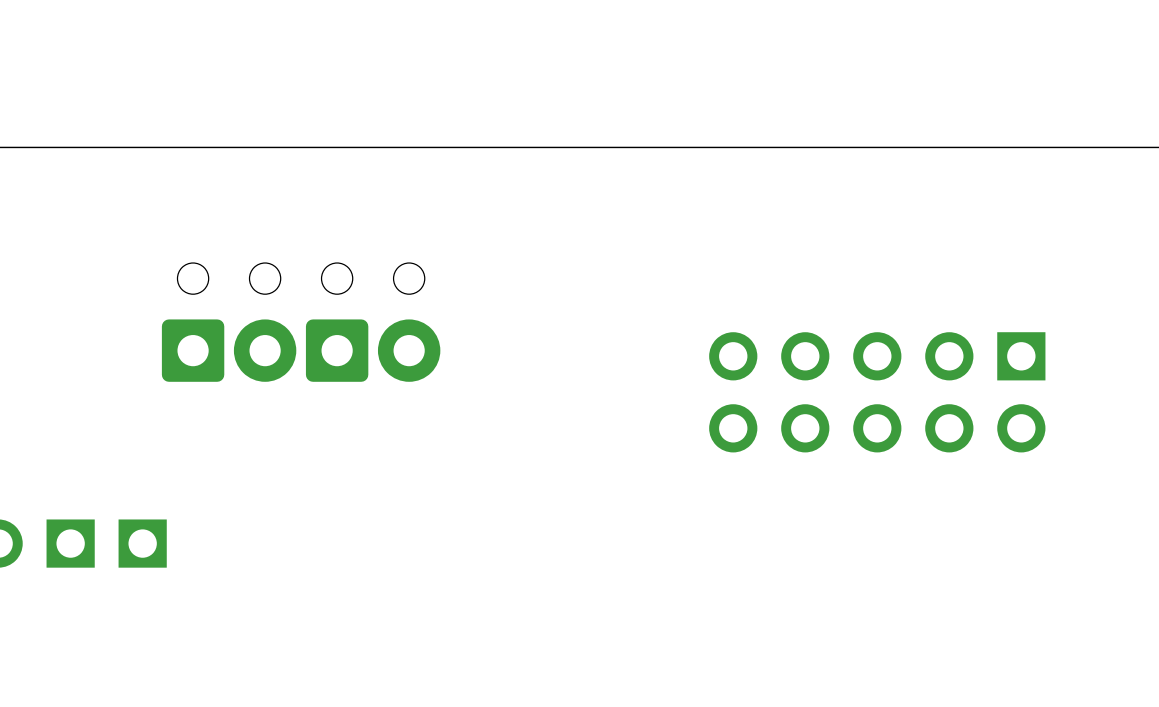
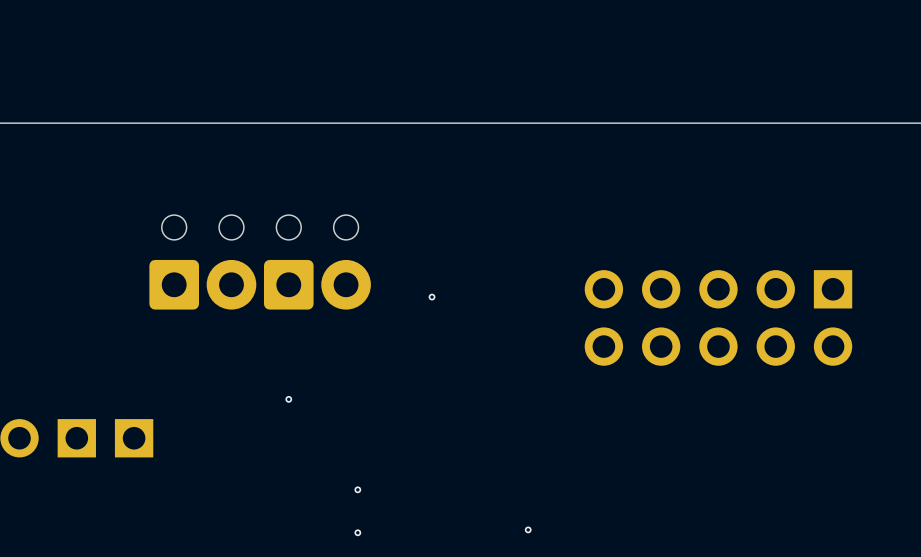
via: none -> (432, 297)
via: none -> (288, 399)
via: none -> (357, 489)
via: none -> (528, 529)
via: none -> (357, 532)

